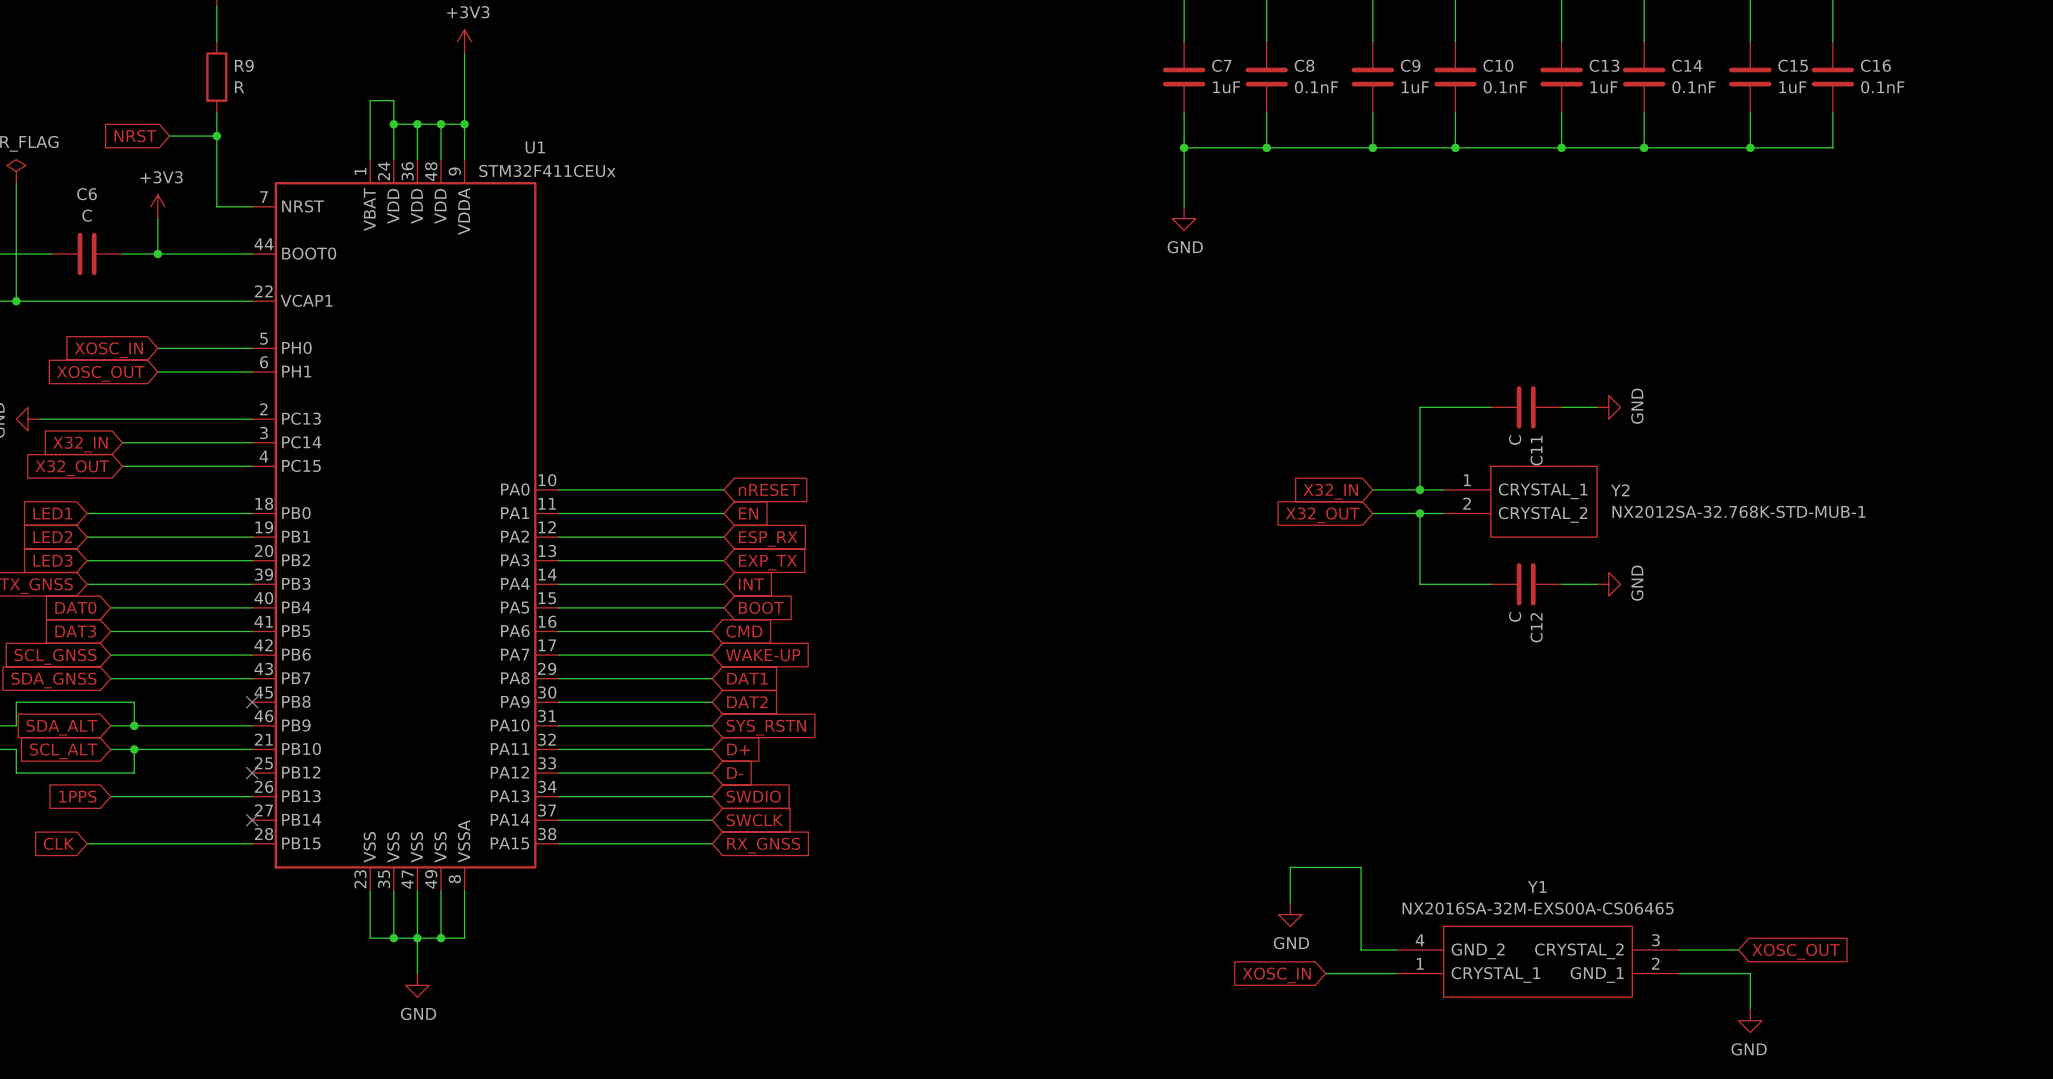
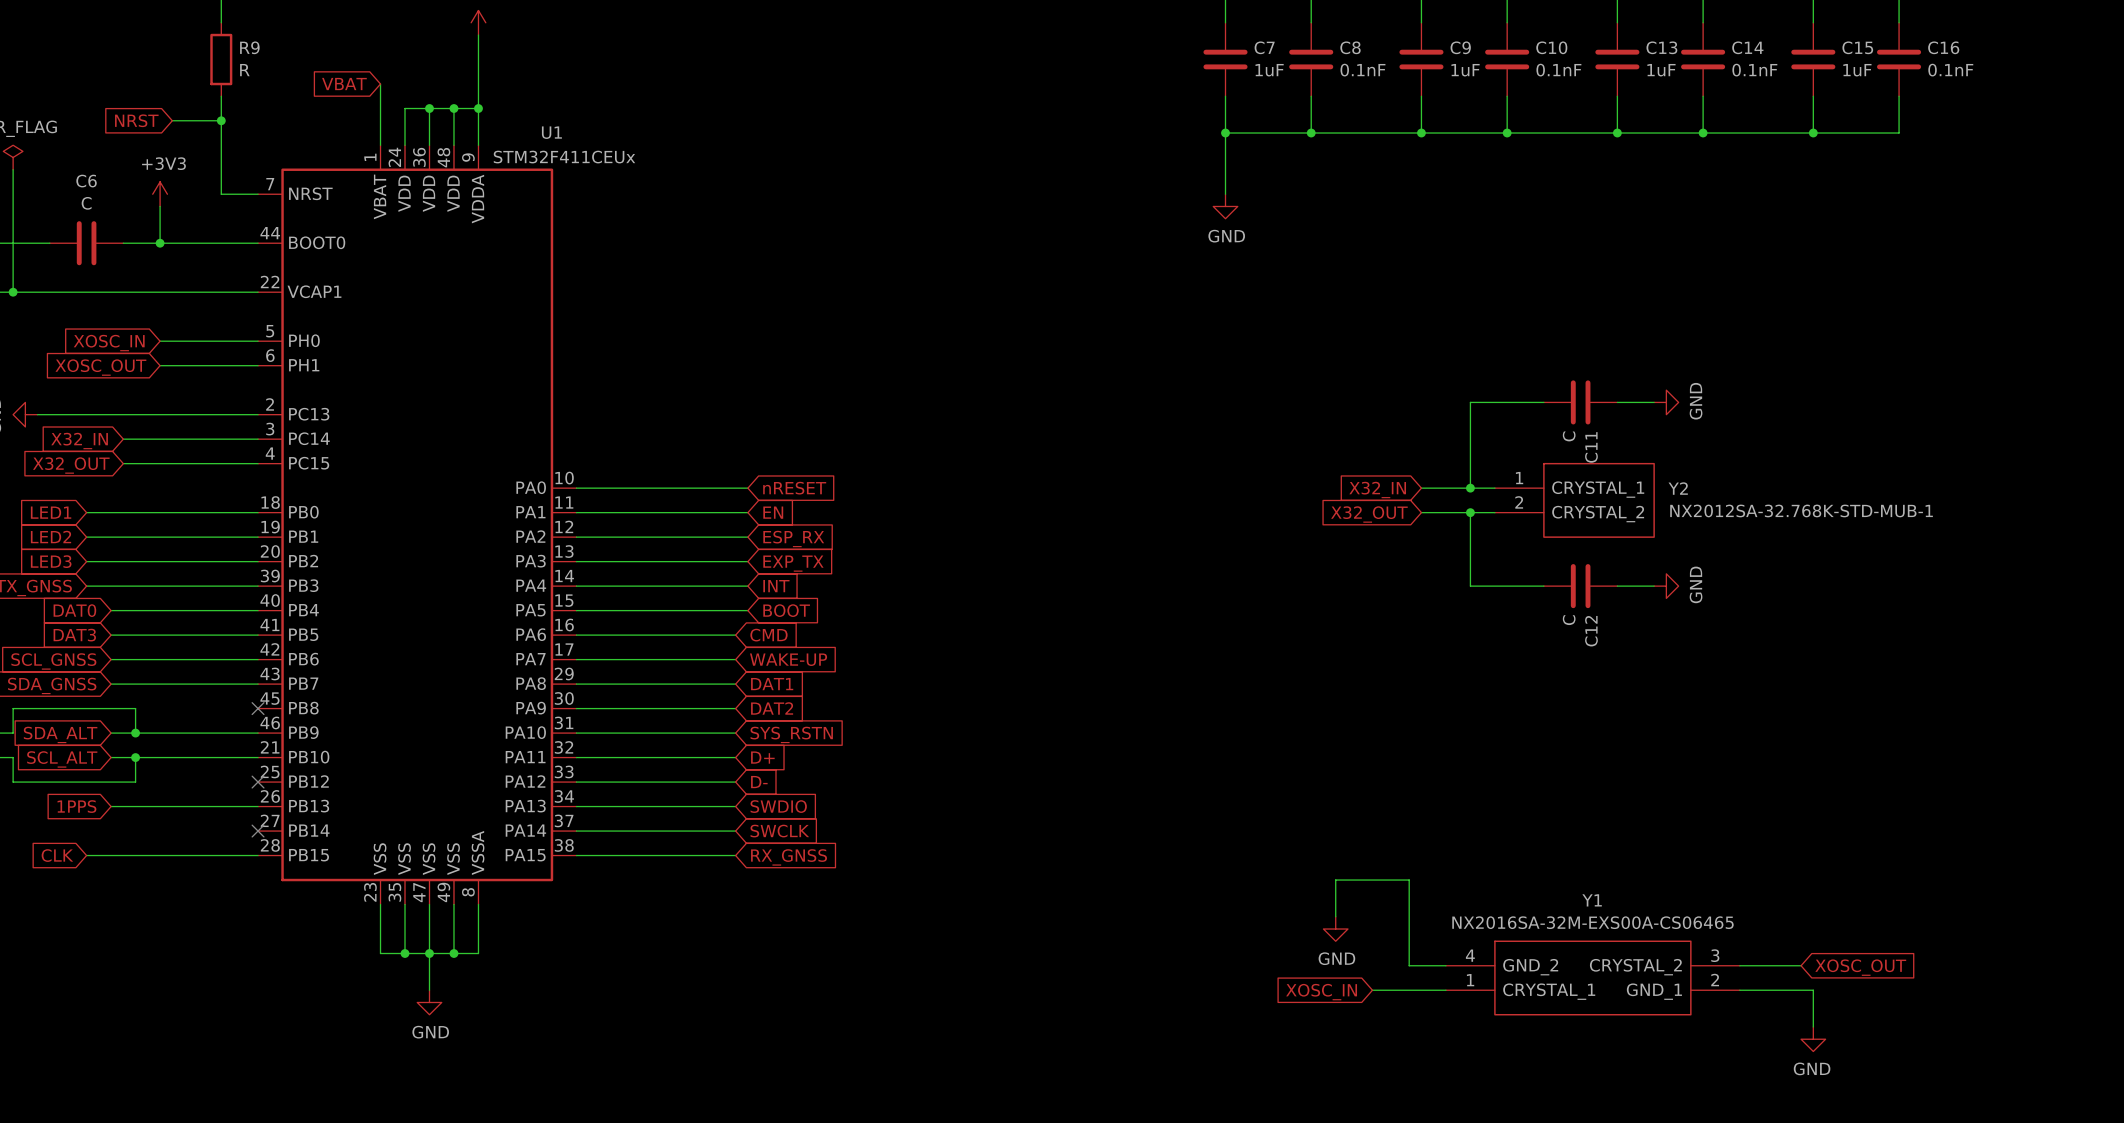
global label: none -> VBAT (344, 84)
wire: (370, 100) (393, 100) (393, 124) -> none
junction: (393, 124) -> none

